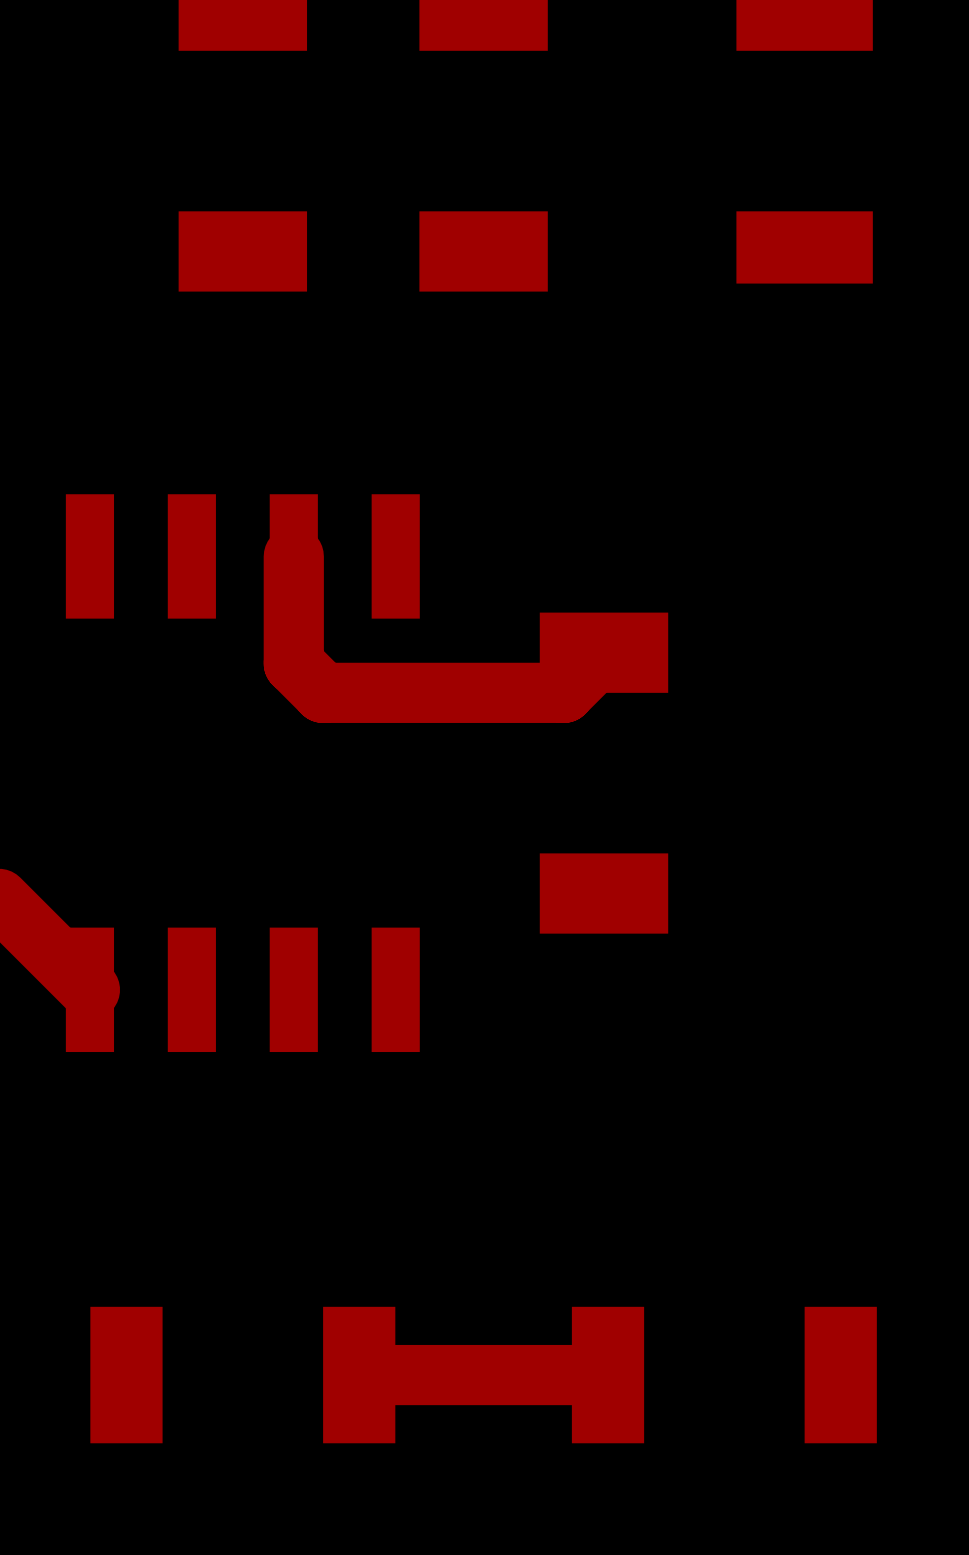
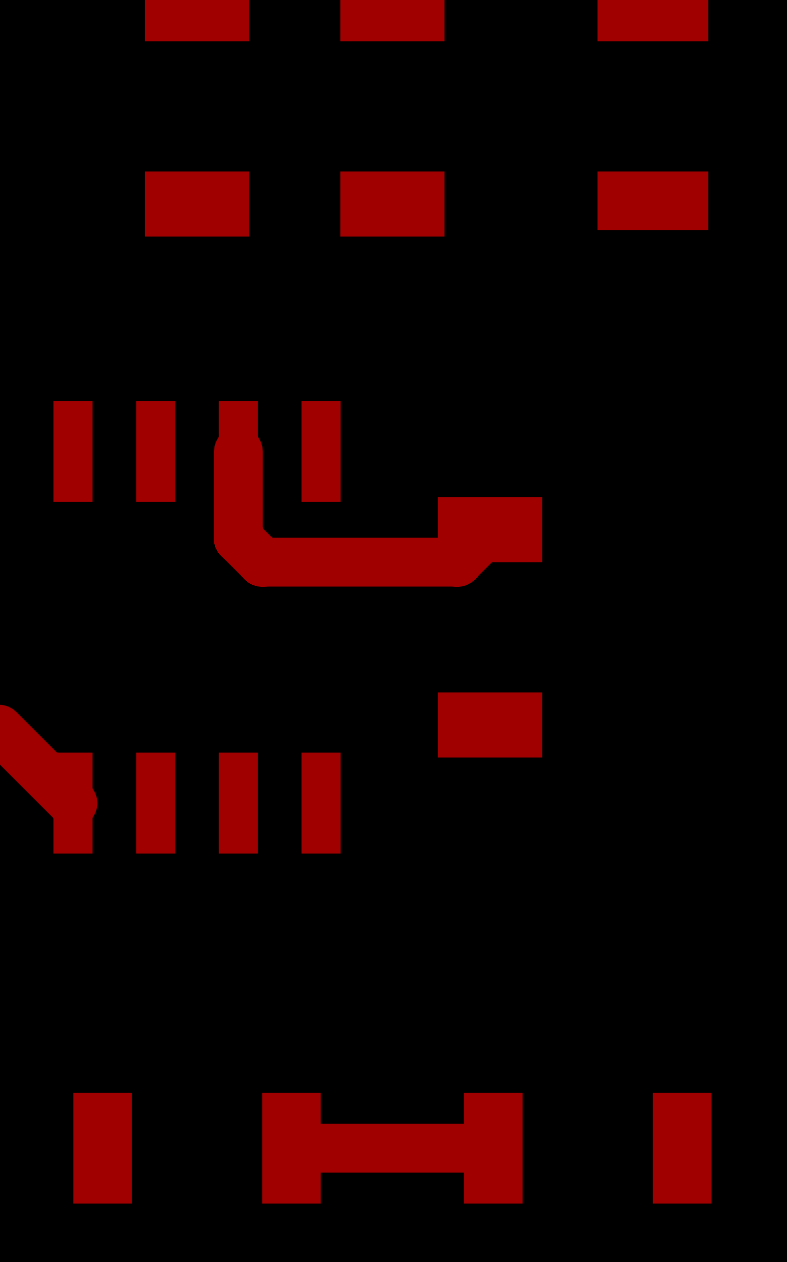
part position: (242, 1375) -> (197, 1148)
top track: (608, 1375) (359, 1375) -> (493, 1148) (291, 1148)
part position: (724, 1375) -> (587, 1148)

